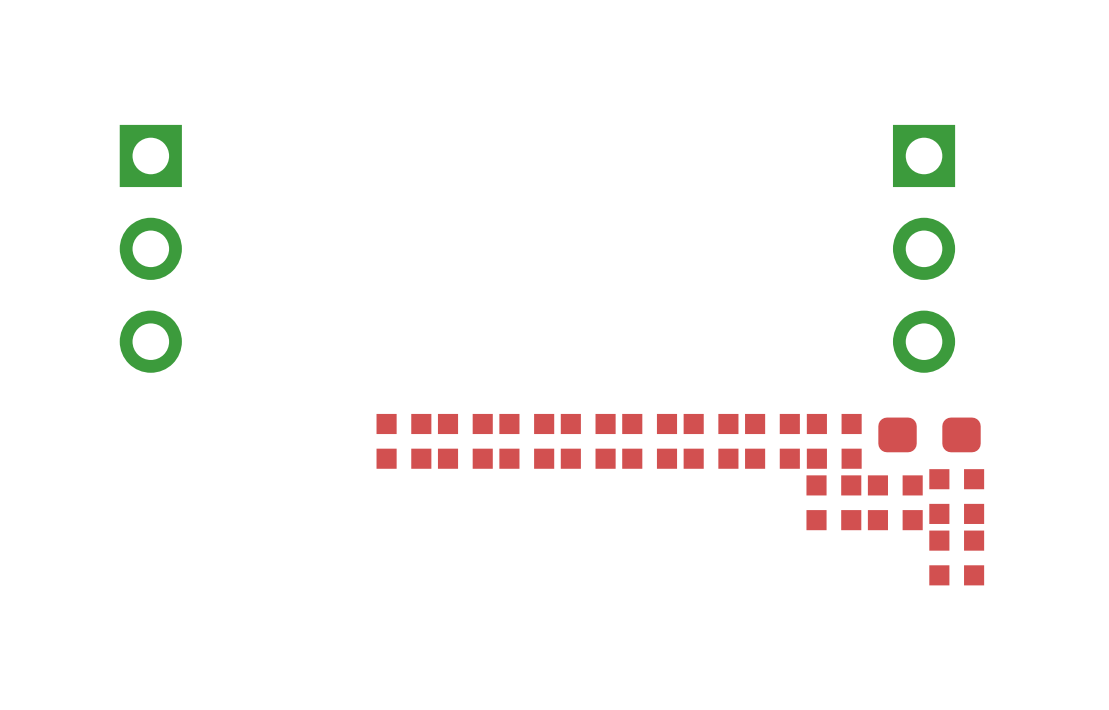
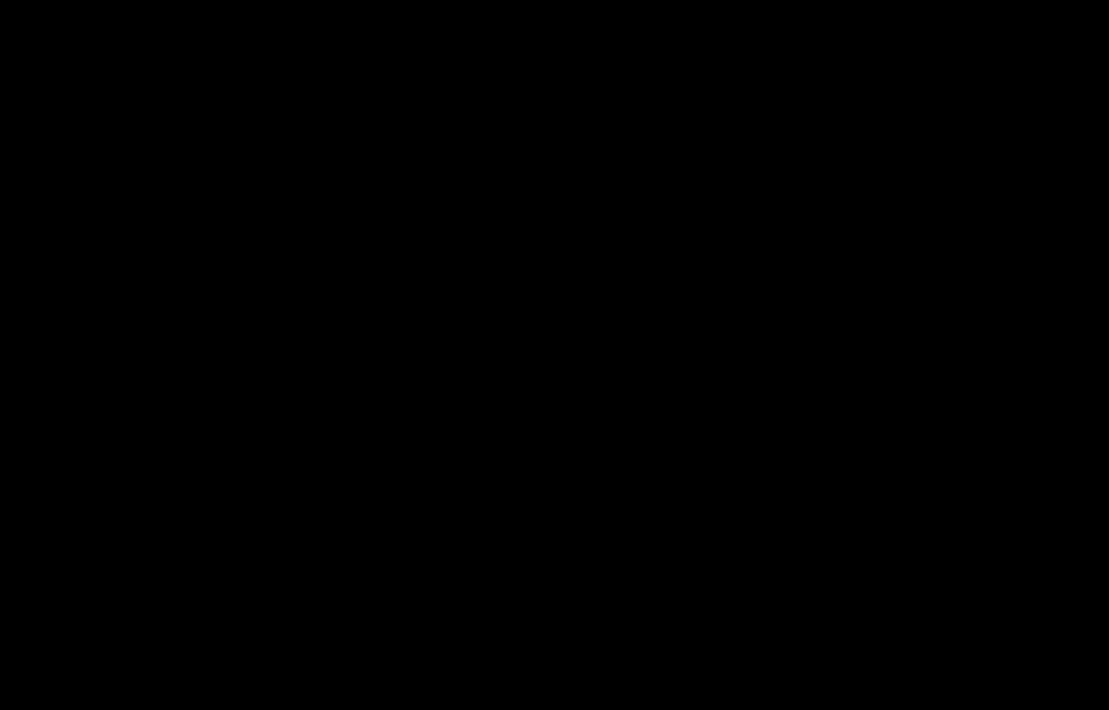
part: (150, 248) -> none
part: (924, 248) -> none
part: (929, 434) -> none
part: (403, 441) -> none
part: (465, 441) -> none
part: (526, 441) -> none
part: (588, 441) -> none
part: (649, 441) -> none
part: (711, 441) -> none
part: (772, 441) -> none
part: (834, 441) -> none
part: (956, 496) -> none
part: (833, 502) -> none
part: (895, 502) -> none
part: (956, 557) -> none

